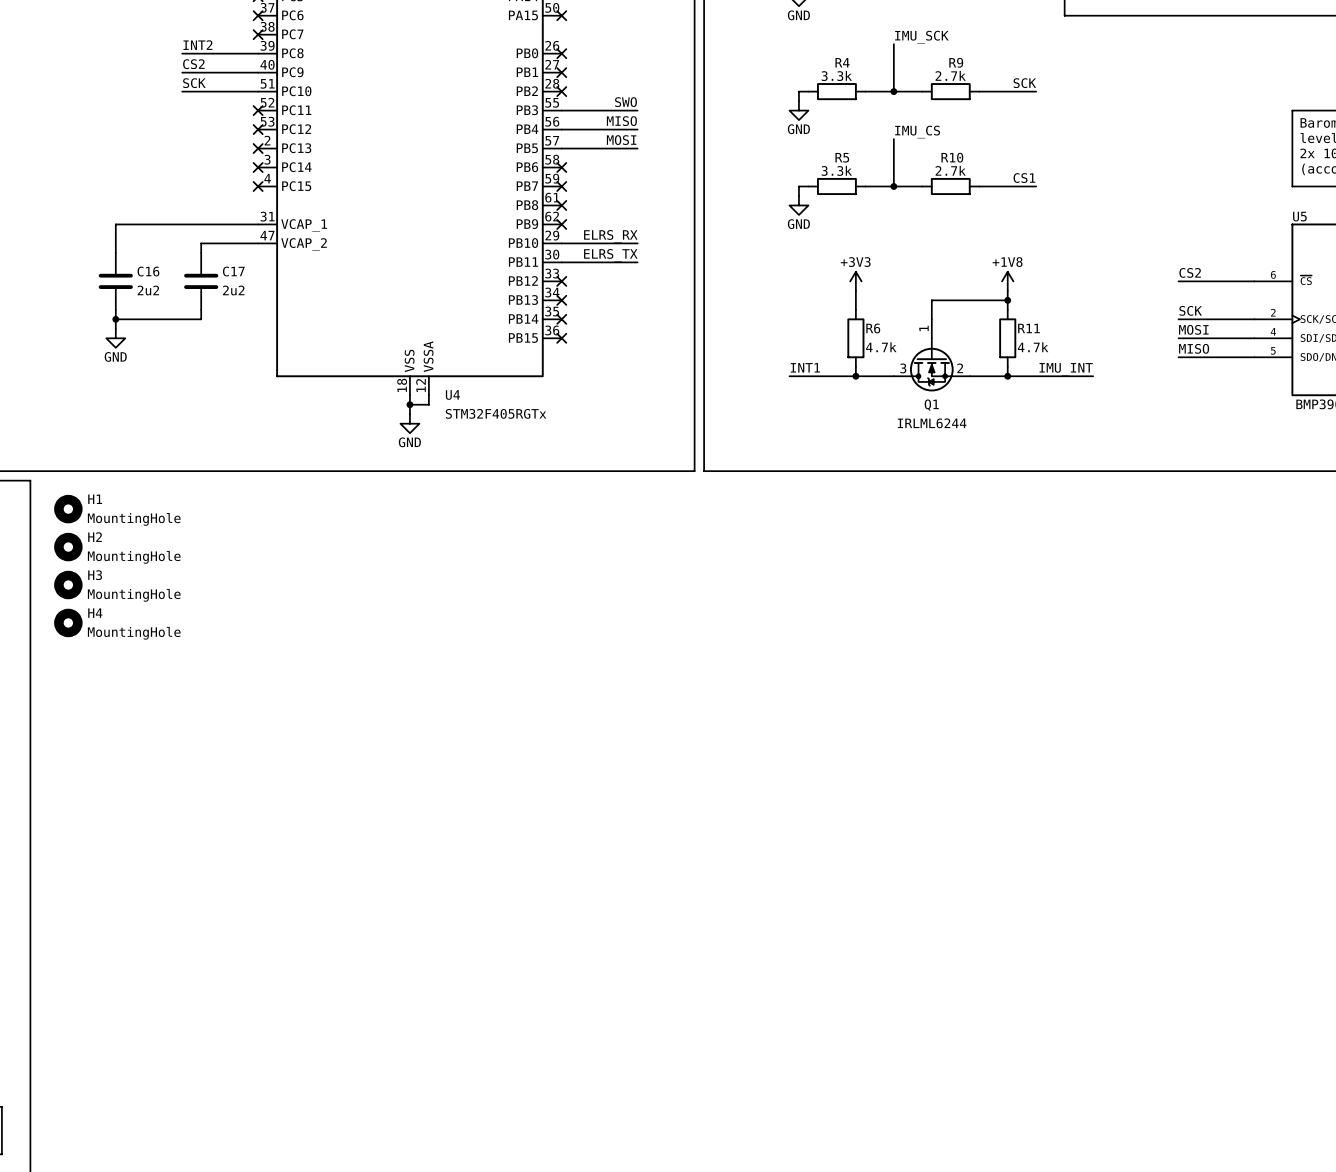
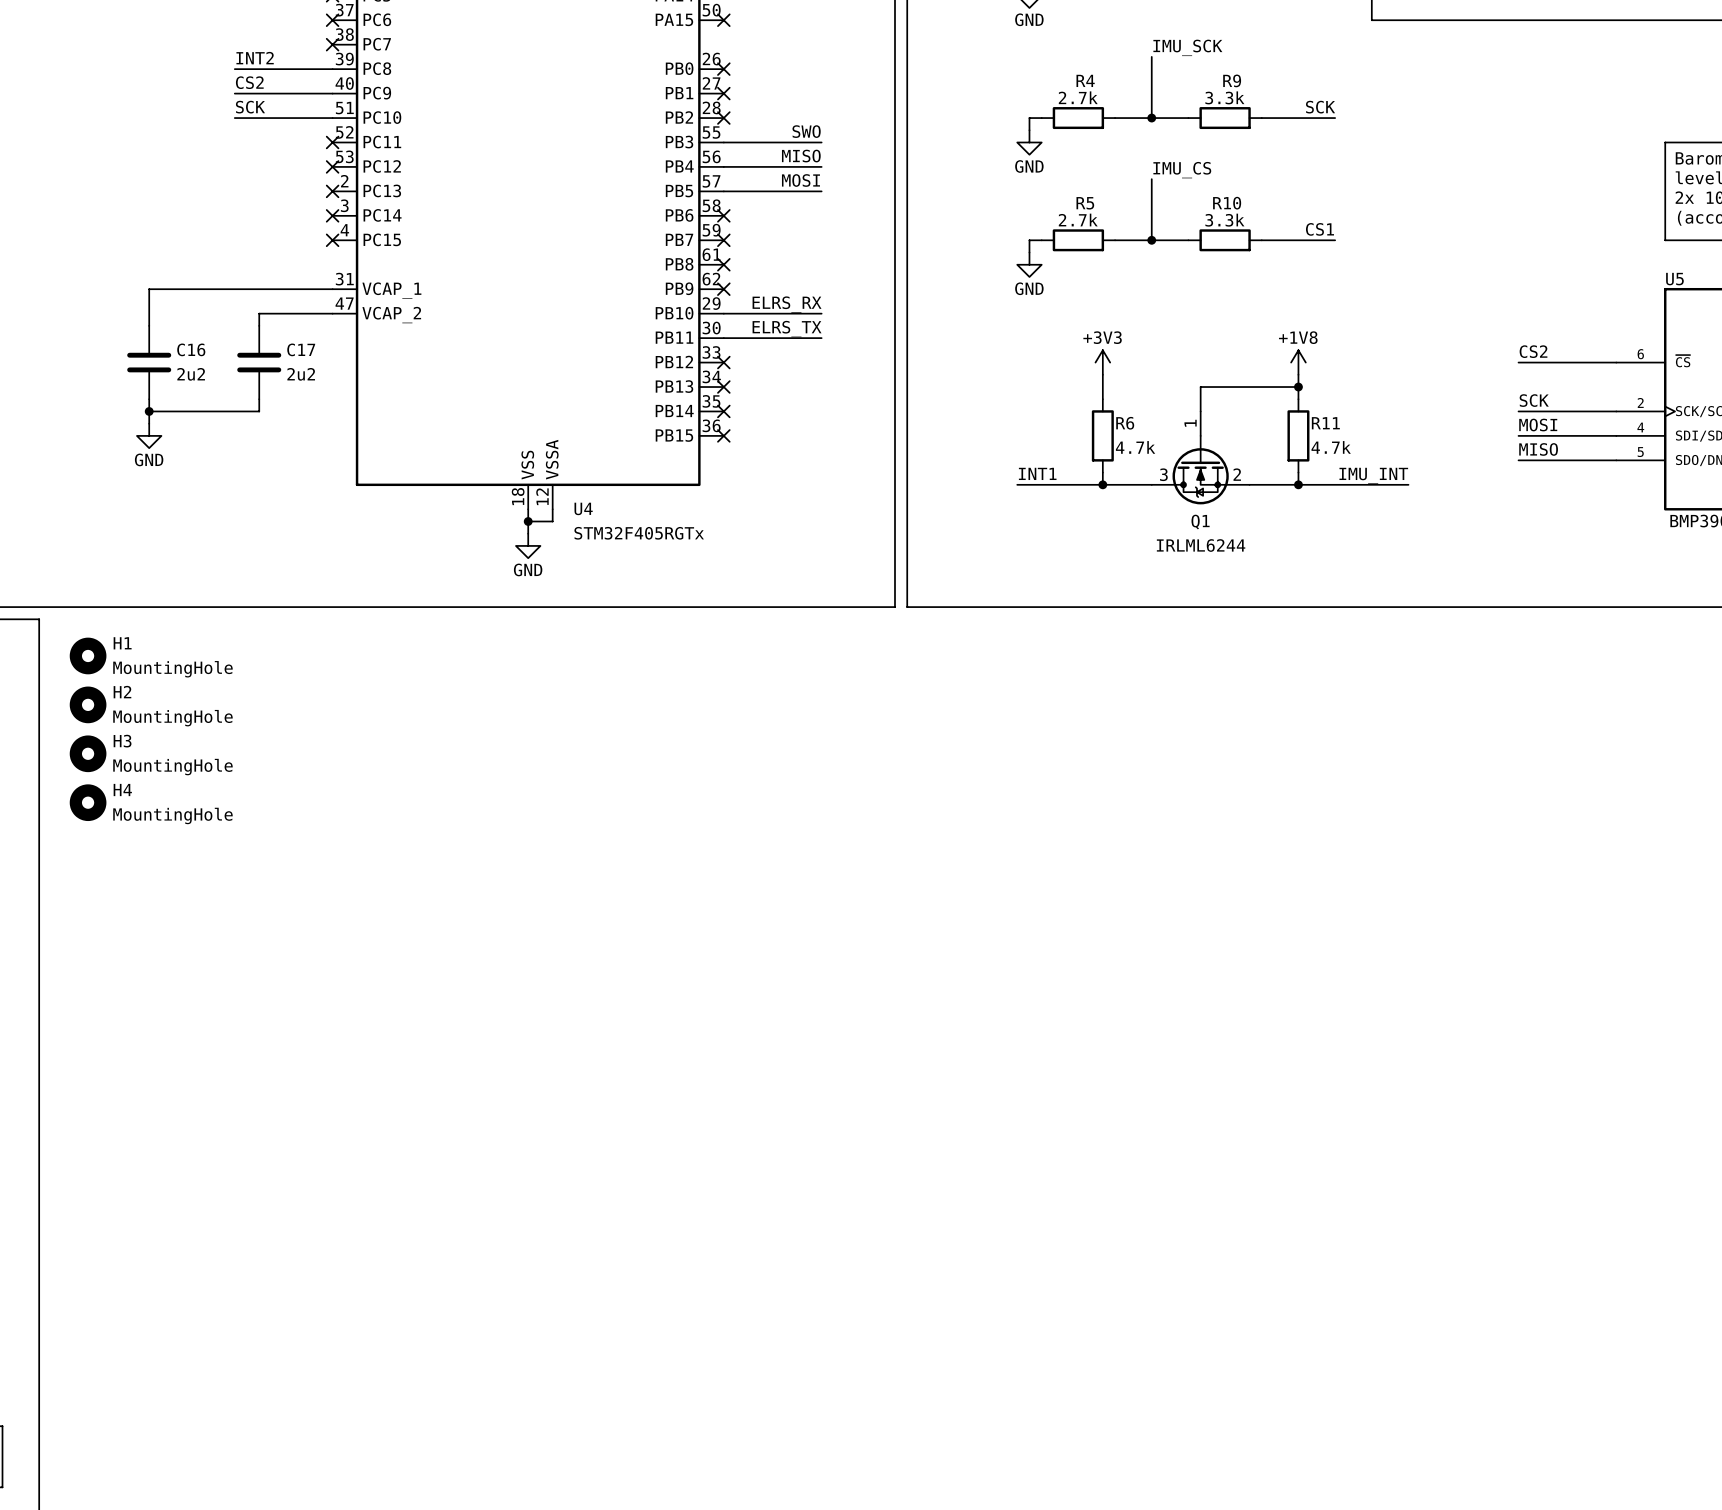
R4 value: 3.3k (836, 75) -> 2.7k (1078, 97)
R9 value: 2.7k (950, 75) -> 3.3k (1224, 97)
R5 value: 3.3k (836, 170) -> 2.7k (1078, 220)
R10 value: 2.7k (950, 170) -> 3.3k (1224, 220)

